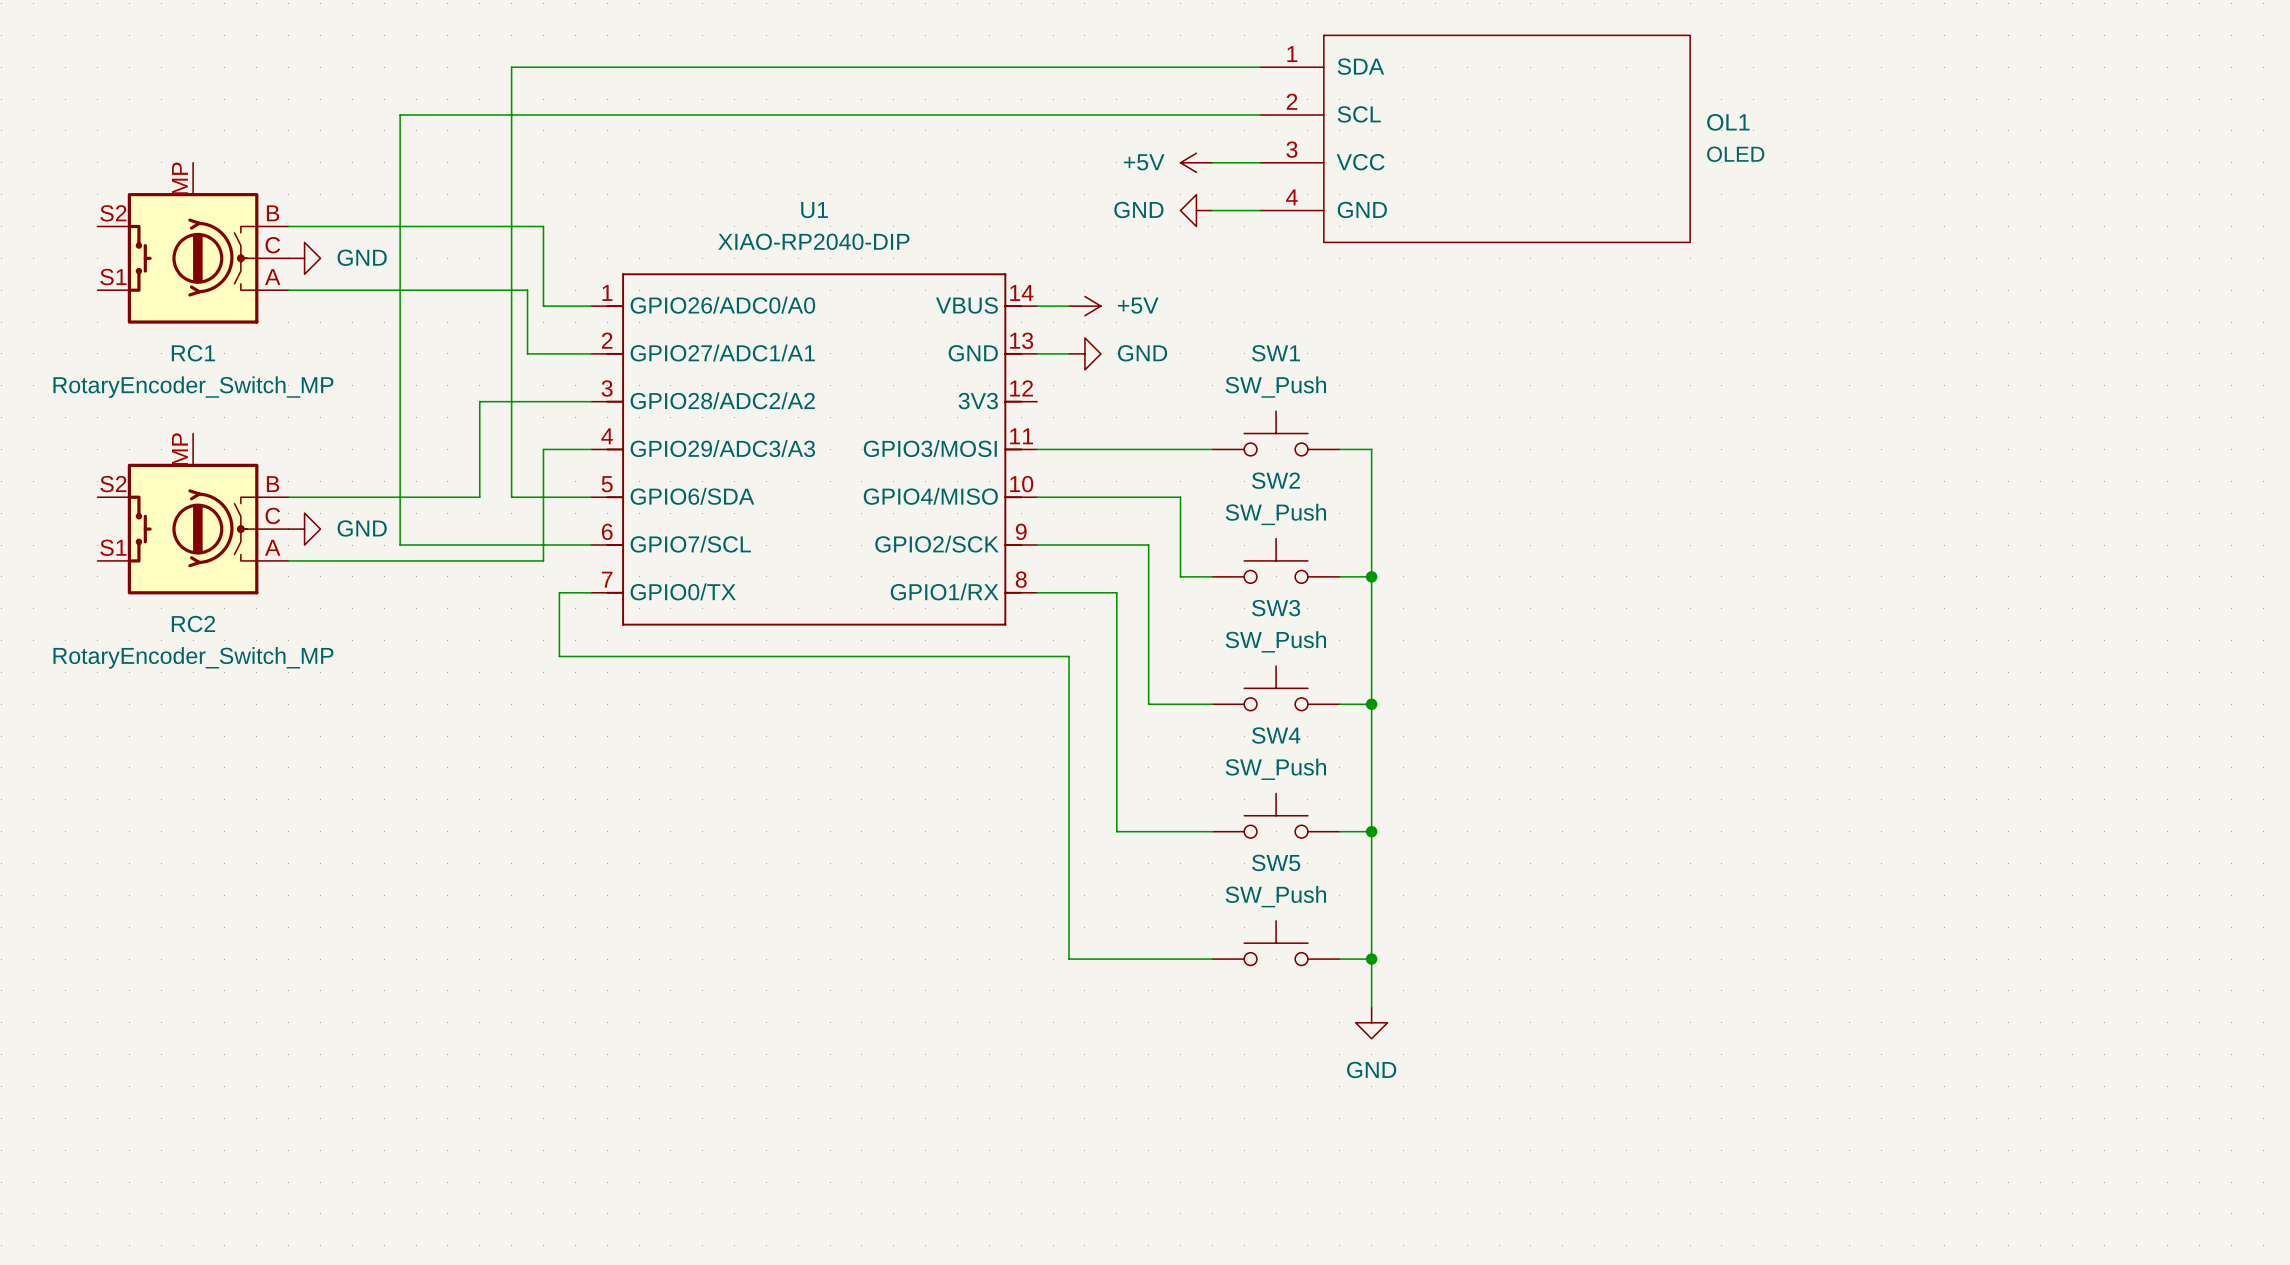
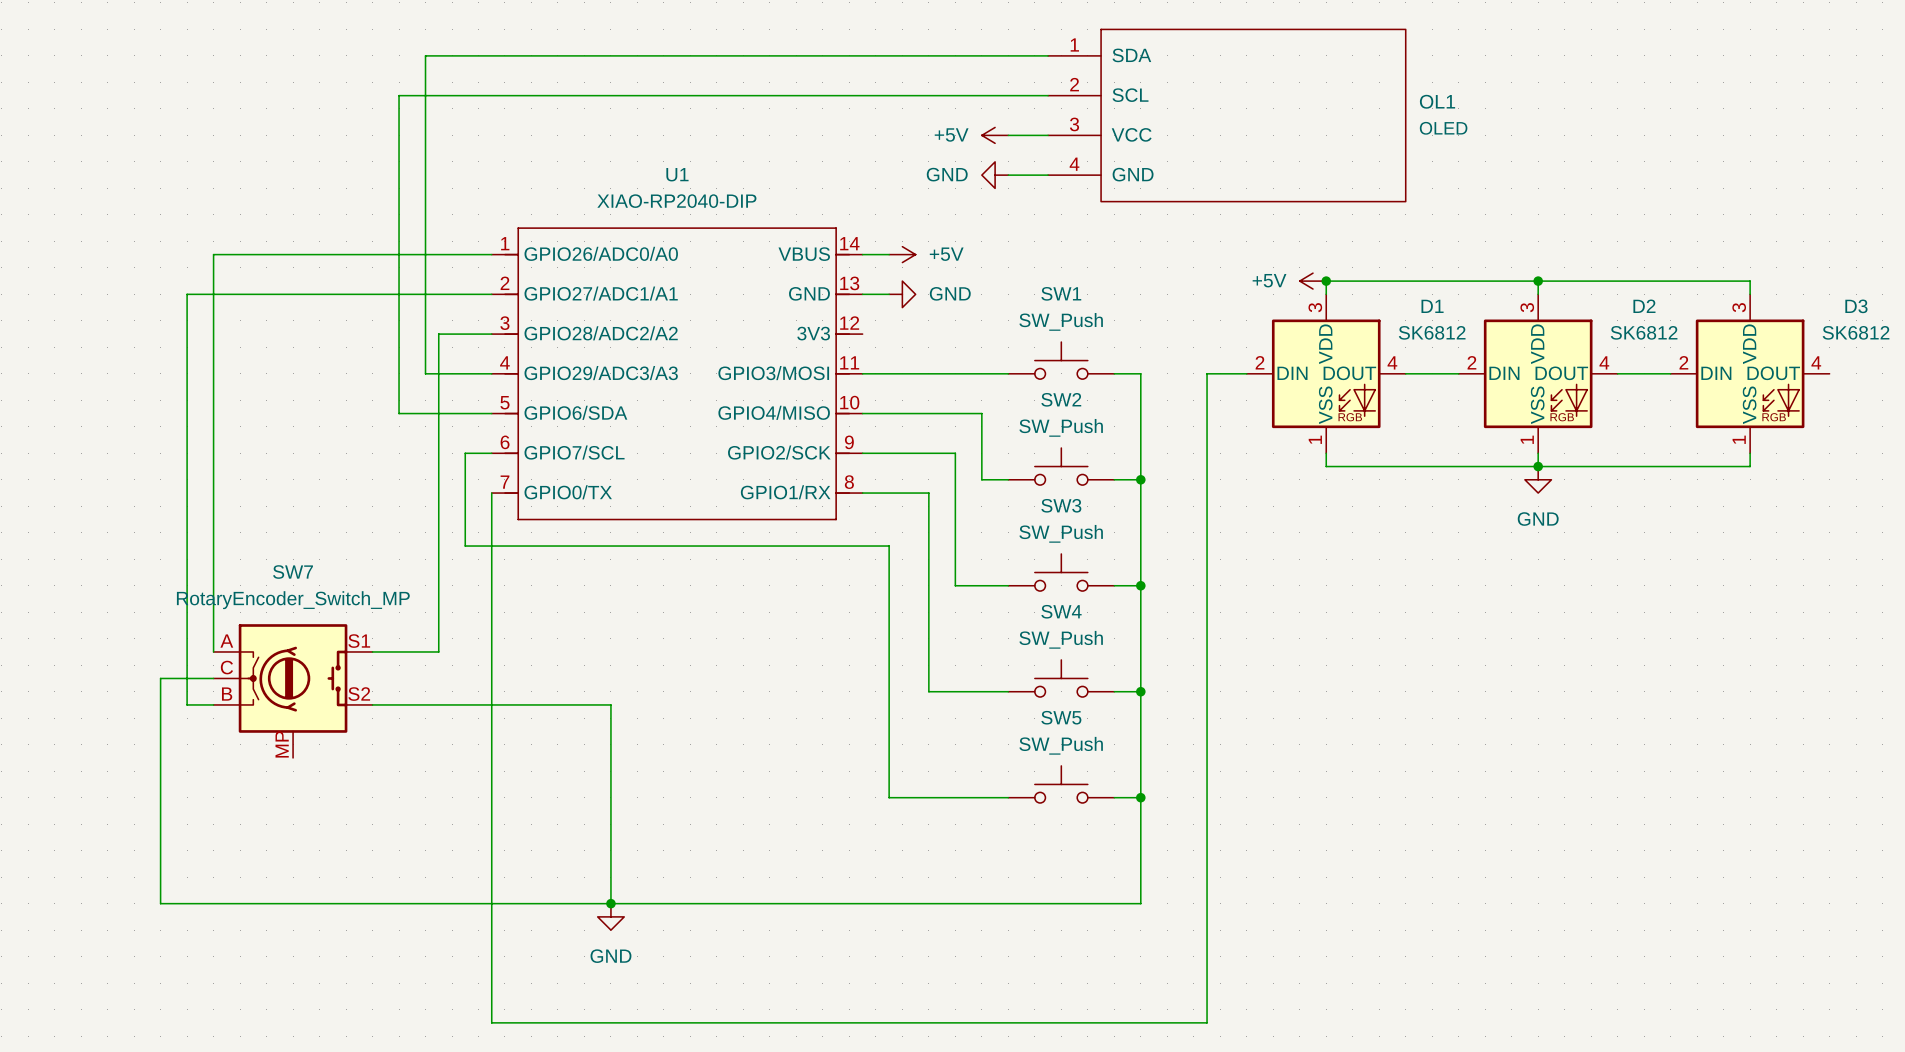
wire: (479, 115) (400, 115) (400, 545) (559, 545) -> (399, 95) (399, 334)
wire: (288, 226) (543, 226) (543, 306) -> (213, 651) (213, 254) (452, 254)
RC1: RotaryEncoder_Switch_MP (193, 243) -> none
power symbol: GND (304, 258) -> none
wire: (288, 290) (527, 290) (527, 353) -> (213, 704) (187, 704) (187, 294) (438, 294)
power symbol: none -> +5V (1313, 281)
junction: none -> (1326, 281)
wire: none -> (1538, 281) (1538, 294)
junction: none -> (1538, 281)
wire: none -> (1326, 294) (1326, 281) (1750, 281) (1750, 294)
wire: (479, 401) (527, 401) -> (372, 651) (438, 651) (438, 334)
wire: (511, 449) (511, 497) -> (425, 373) (452, 373)
wire: (543, 449) (543, 560) (288, 560) -> none
wire: none -> (1246, 373) (1207, 373) (1207, 1022) (491, 1022) (491, 493)
D1: none -> SK6812 (1326, 373)
wire: none -> (1405, 373) (1458, 373)
D2: none -> SK6812 (1538, 373)
wire: none -> (1617, 373) (1670, 373)
D3: none -> SK6812 (1750, 373)
wire: (288, 497) (479, 497) -> (425, 413) (399, 413)
RC2: RotaryEncoder_Switch_MP (193, 513) -> none
power symbol: GND (304, 529) -> none
wire: none -> (1326, 453) (1326, 466) (1750, 466) (1750, 453)
wire: none -> (1538, 453) (1538, 466)
junction: none -> (1538, 466)
power symbol: none -> GND (1538, 479)
wire: (559, 592) (591, 592) -> (465, 493) (465, 453)
wire: none -> (213, 678) (160, 678) (160, 903) (1140, 903) (1140, 837)
SW7: none -> RotaryEncoder_Switch_MP (293, 691)
wire: none -> (372, 704) (610, 704) (610, 903)
power symbol: GND (1371, 1022) -> none
junction: none -> (610, 903)
power symbol: none -> GND (610, 916)

